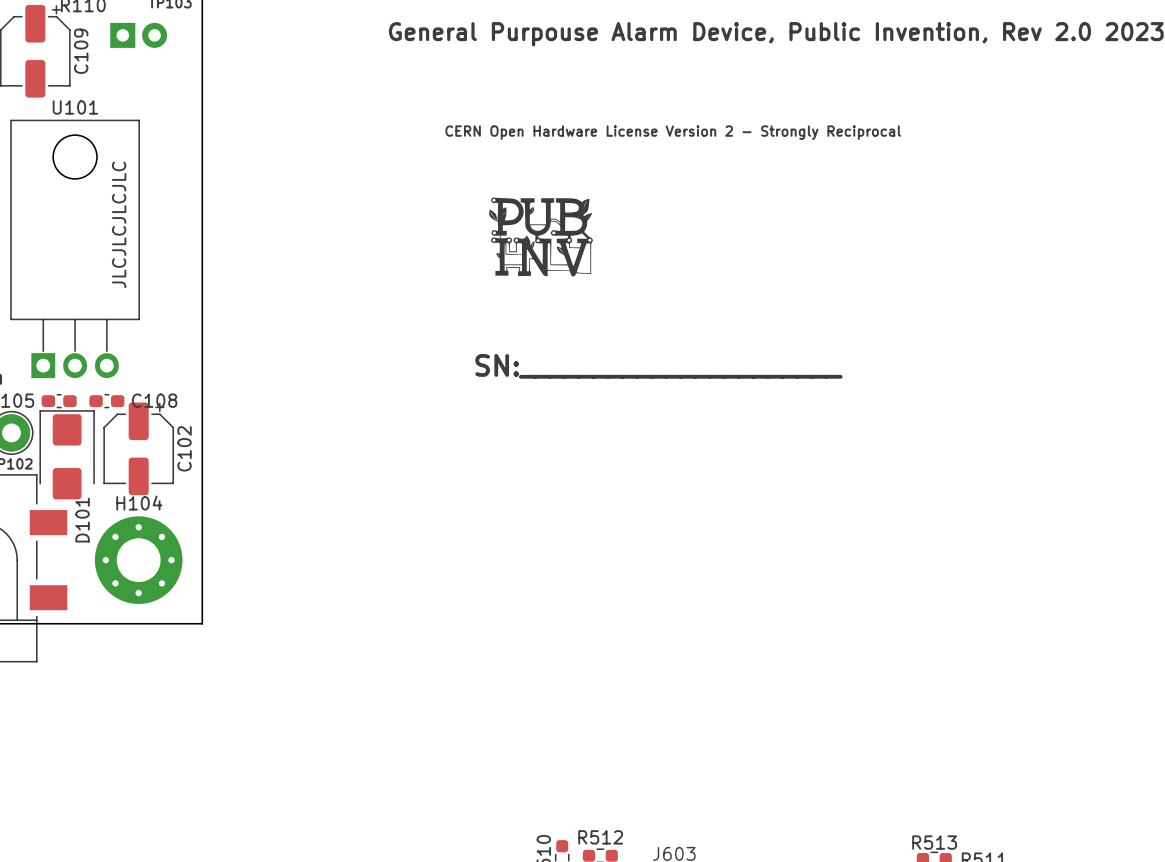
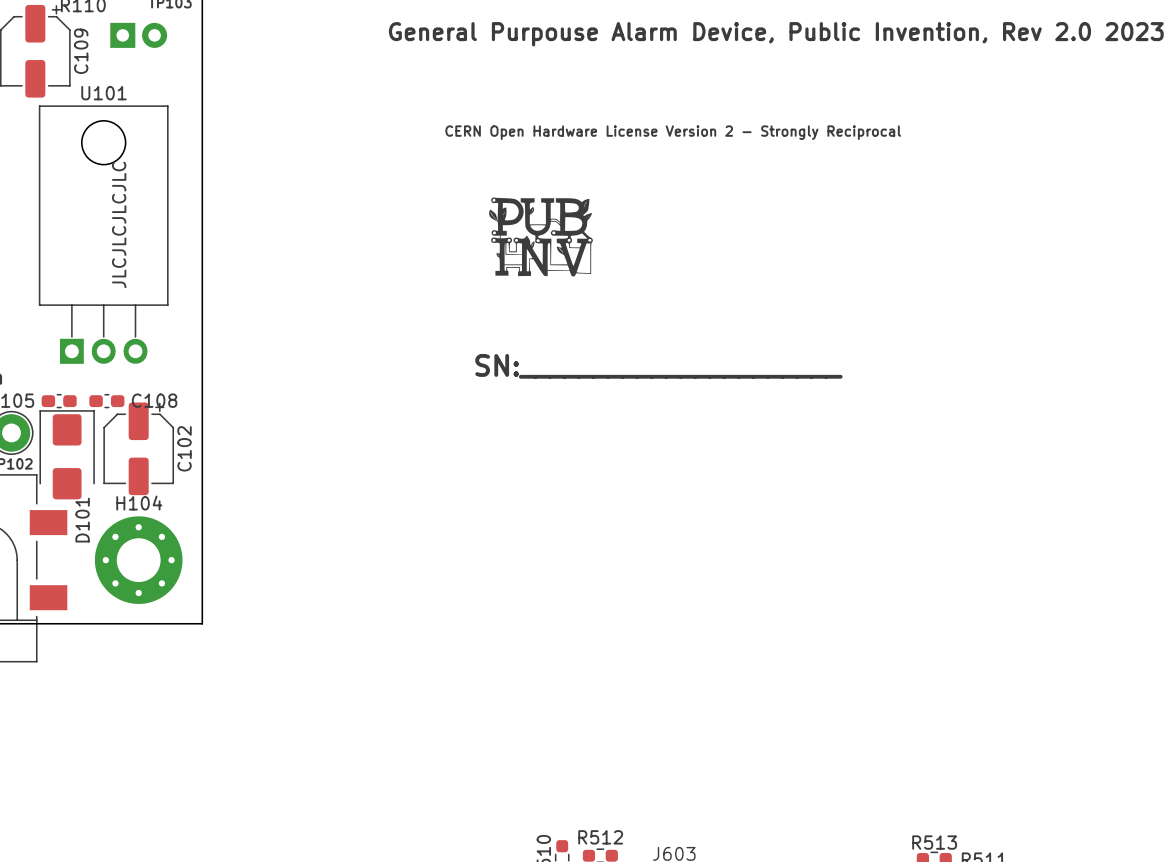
U101 position: (75, 248) -> (103, 234)

